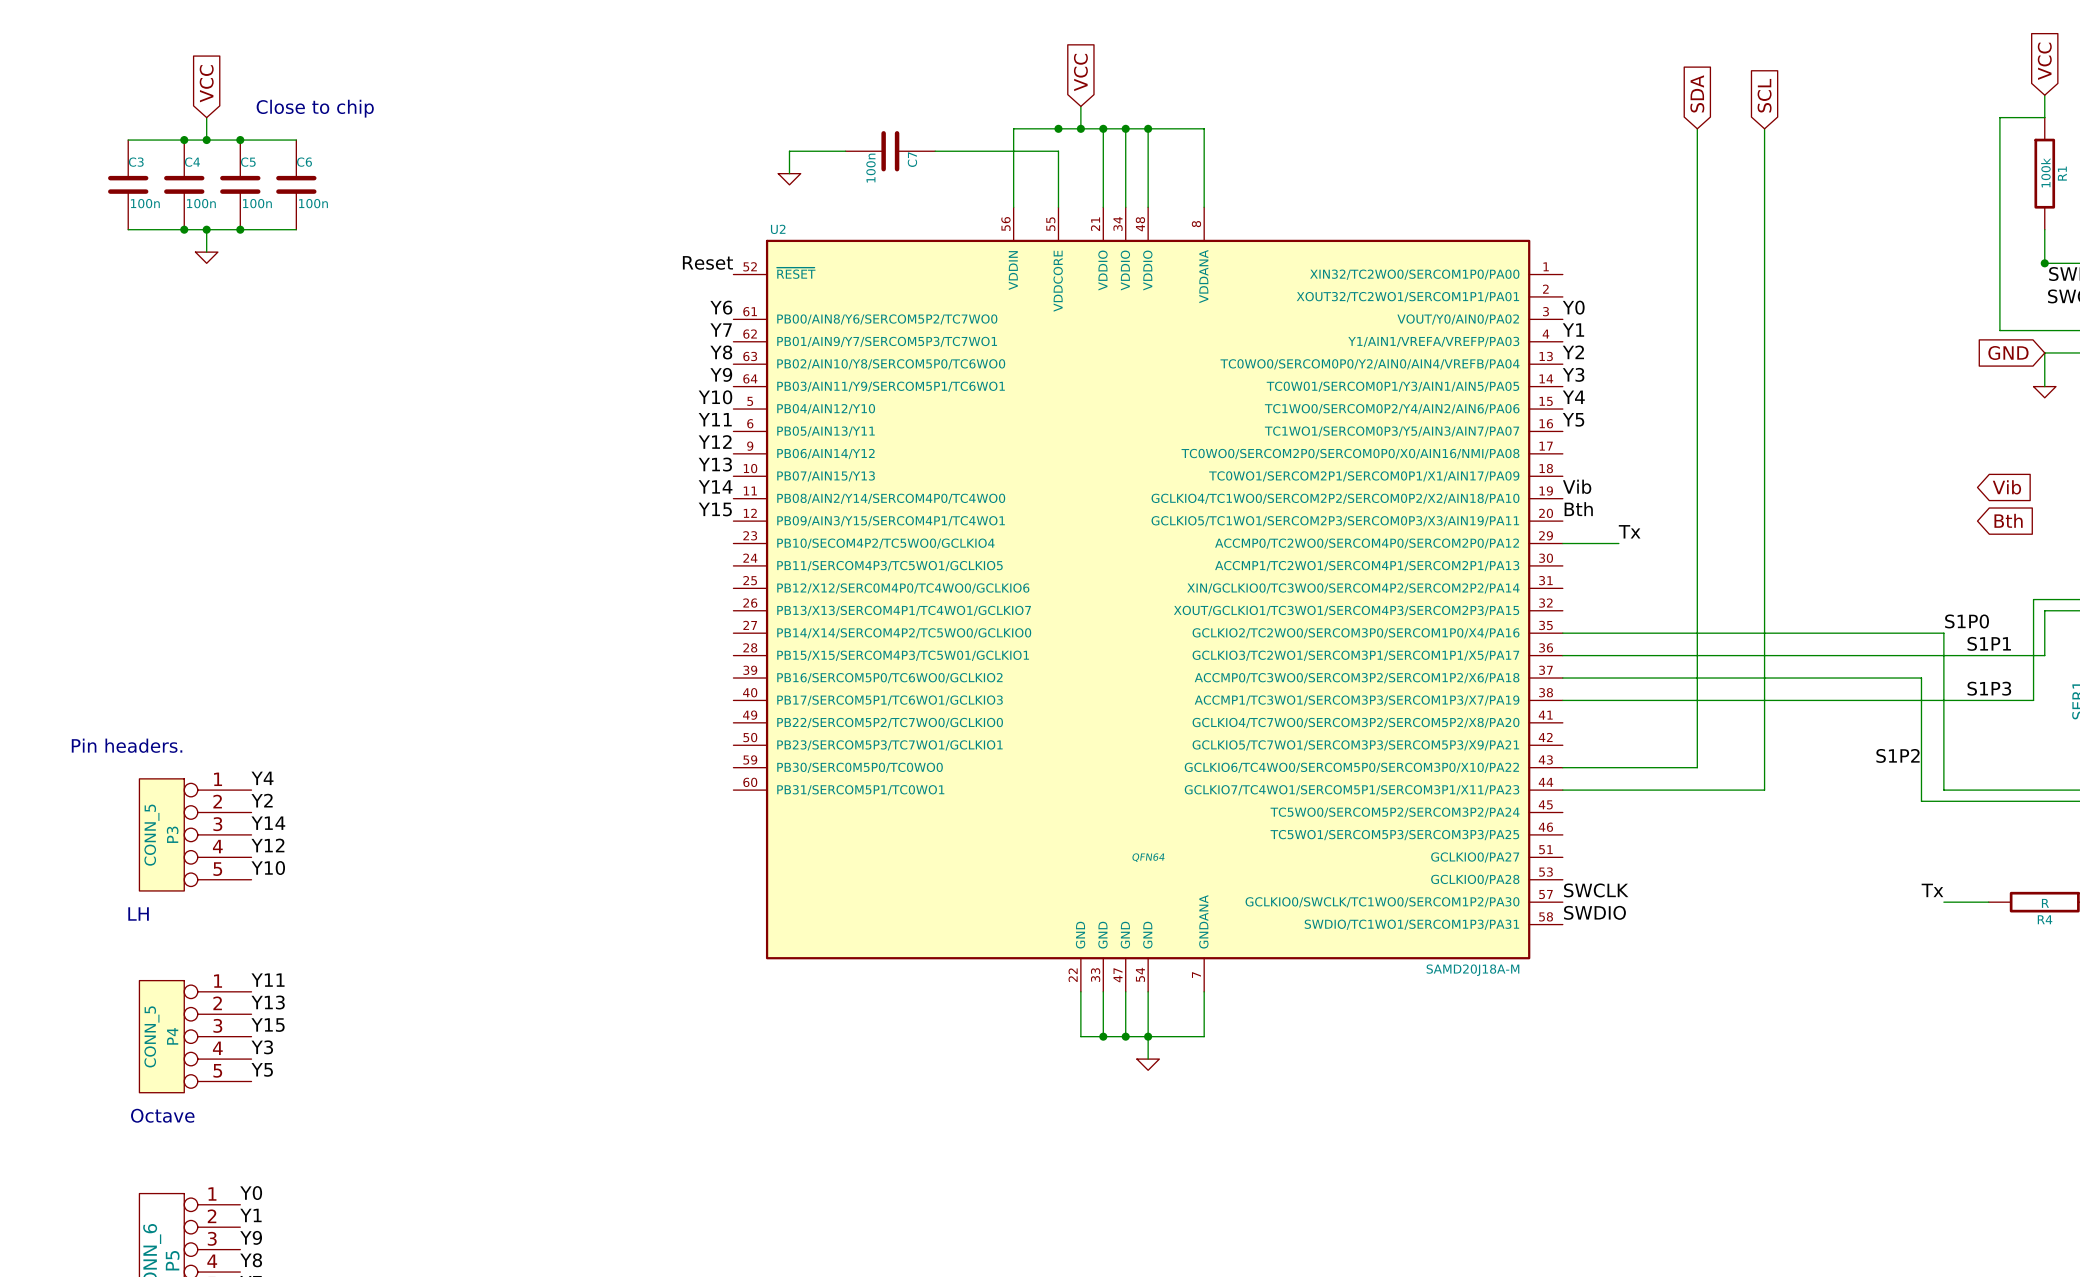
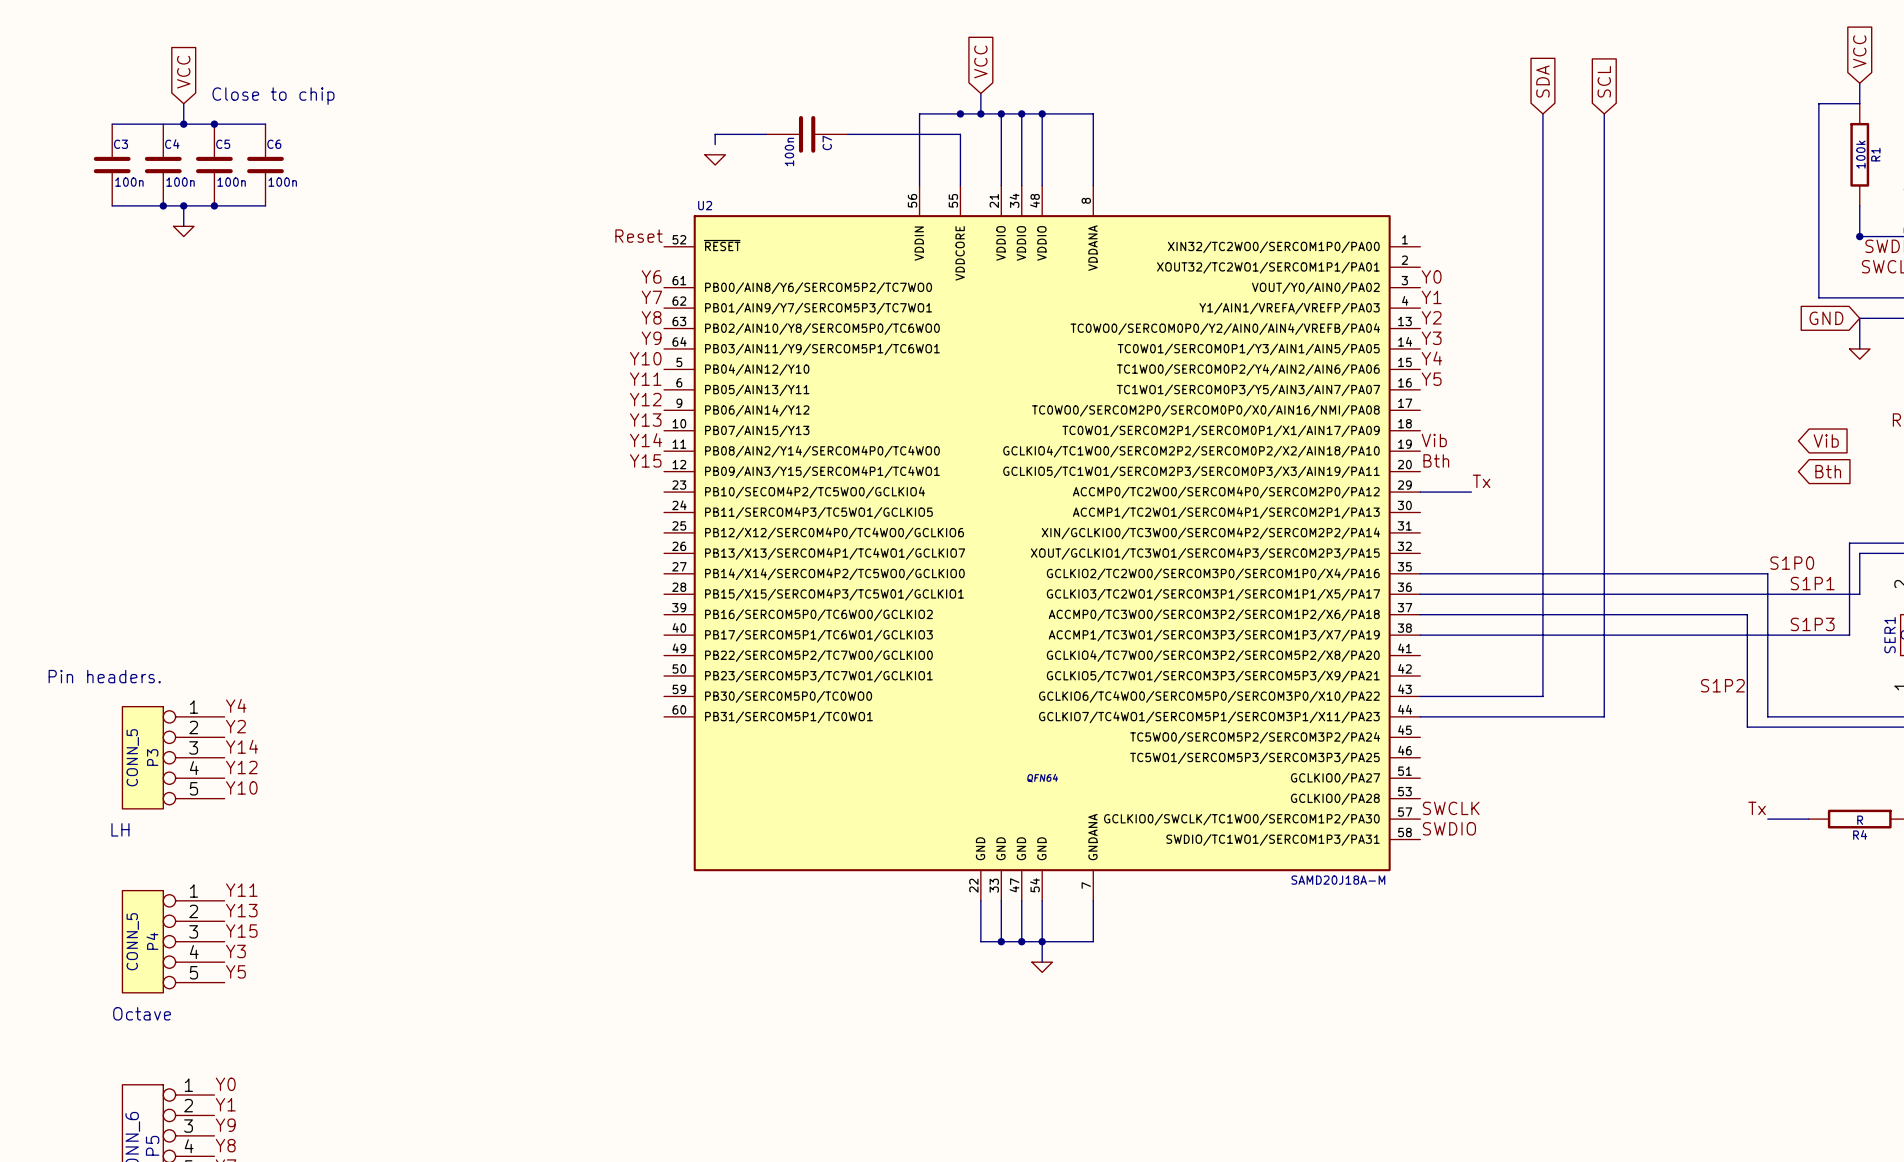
junction: (184, 140) -> none
wire: (789, 162) (789, 173) -> none

